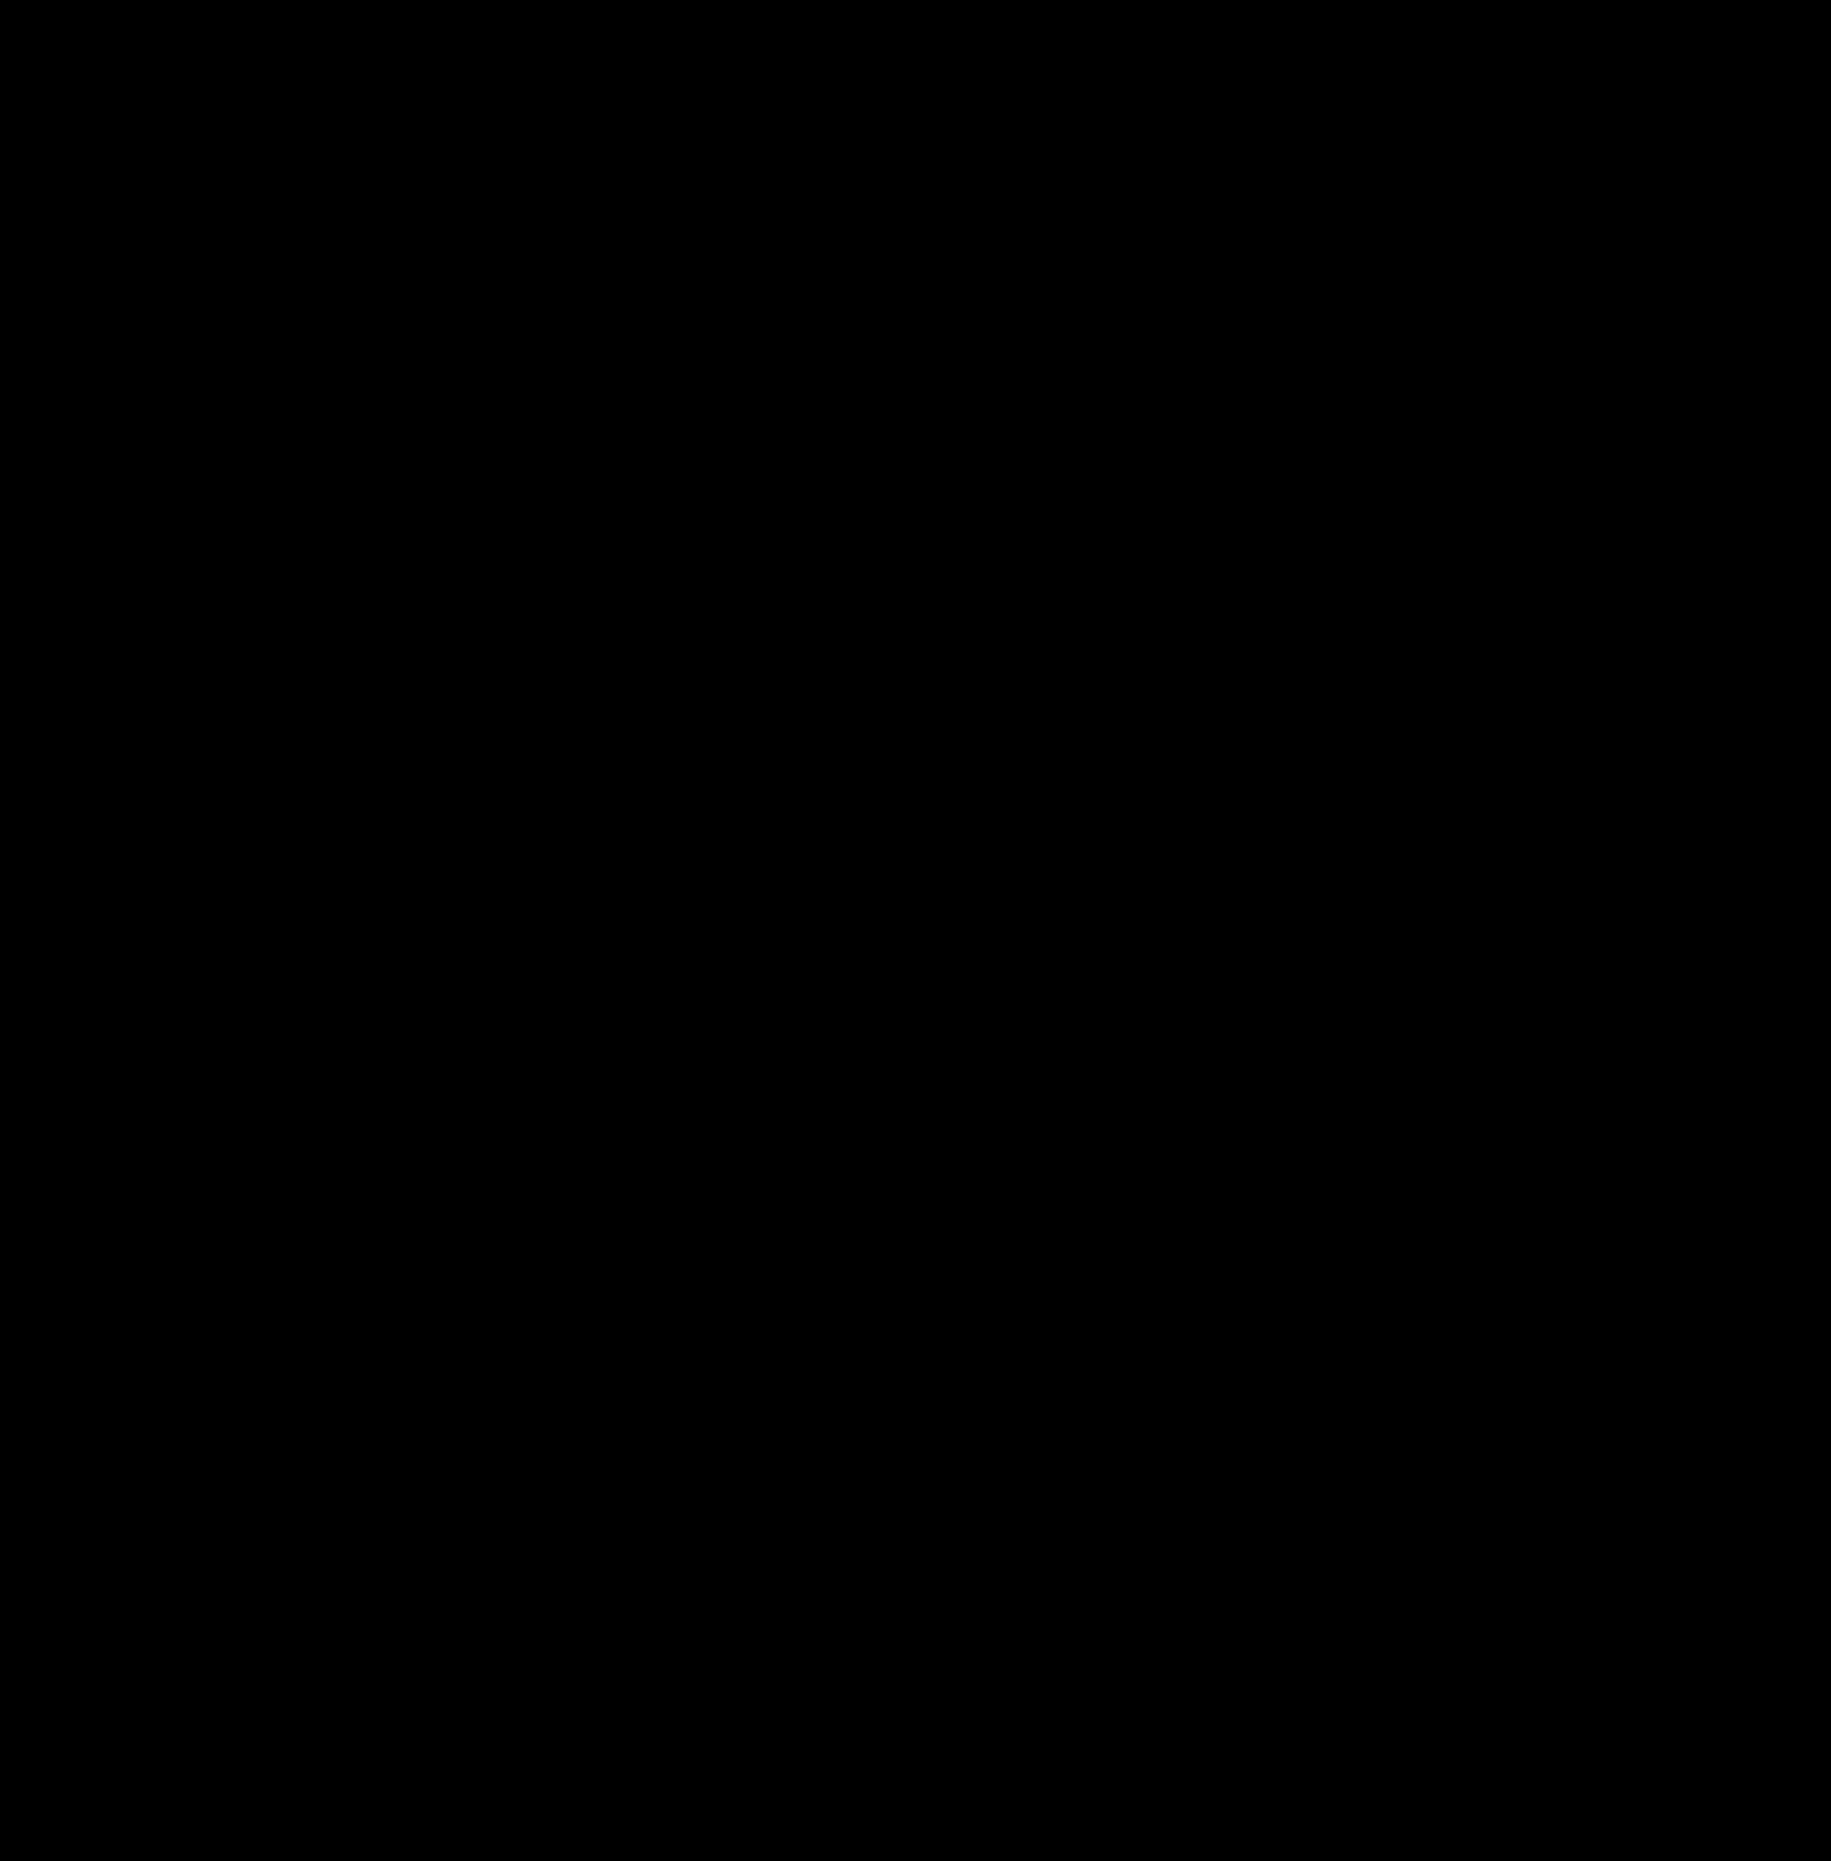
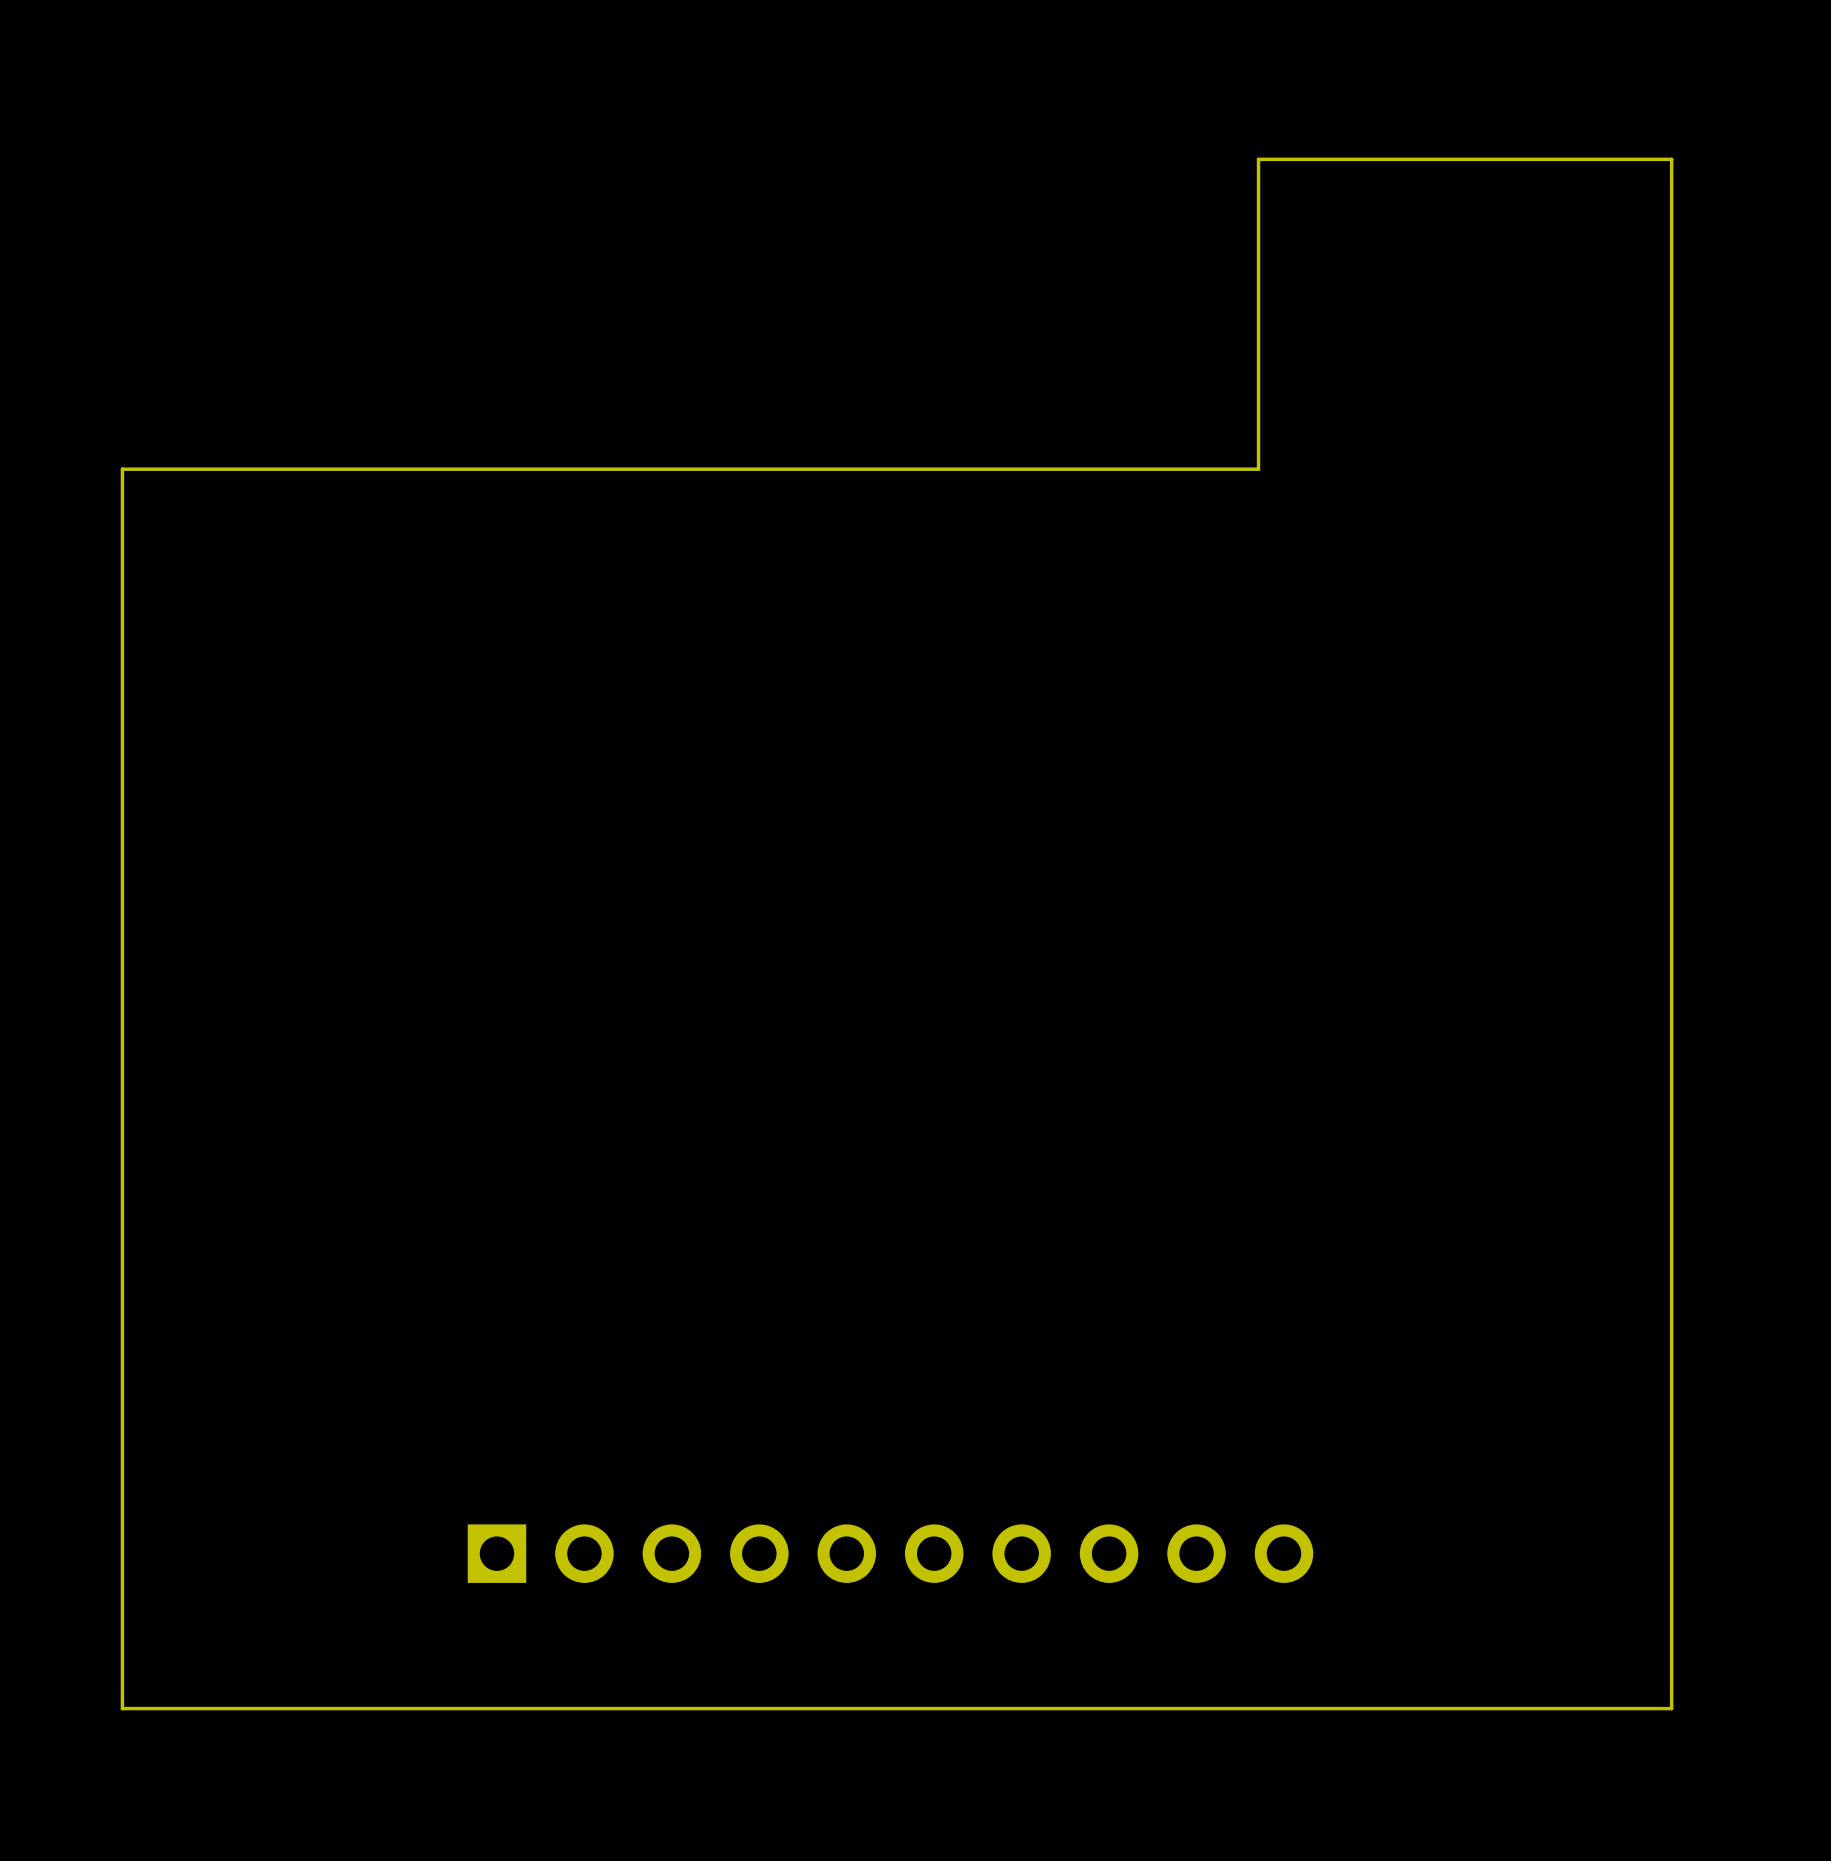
board edge: none -> (1671, 159) (1671, 1708) (122, 1708) (122, 469) (1258, 469) (1258, 159) (1671, 159)
part: none -> (890, 1553)

